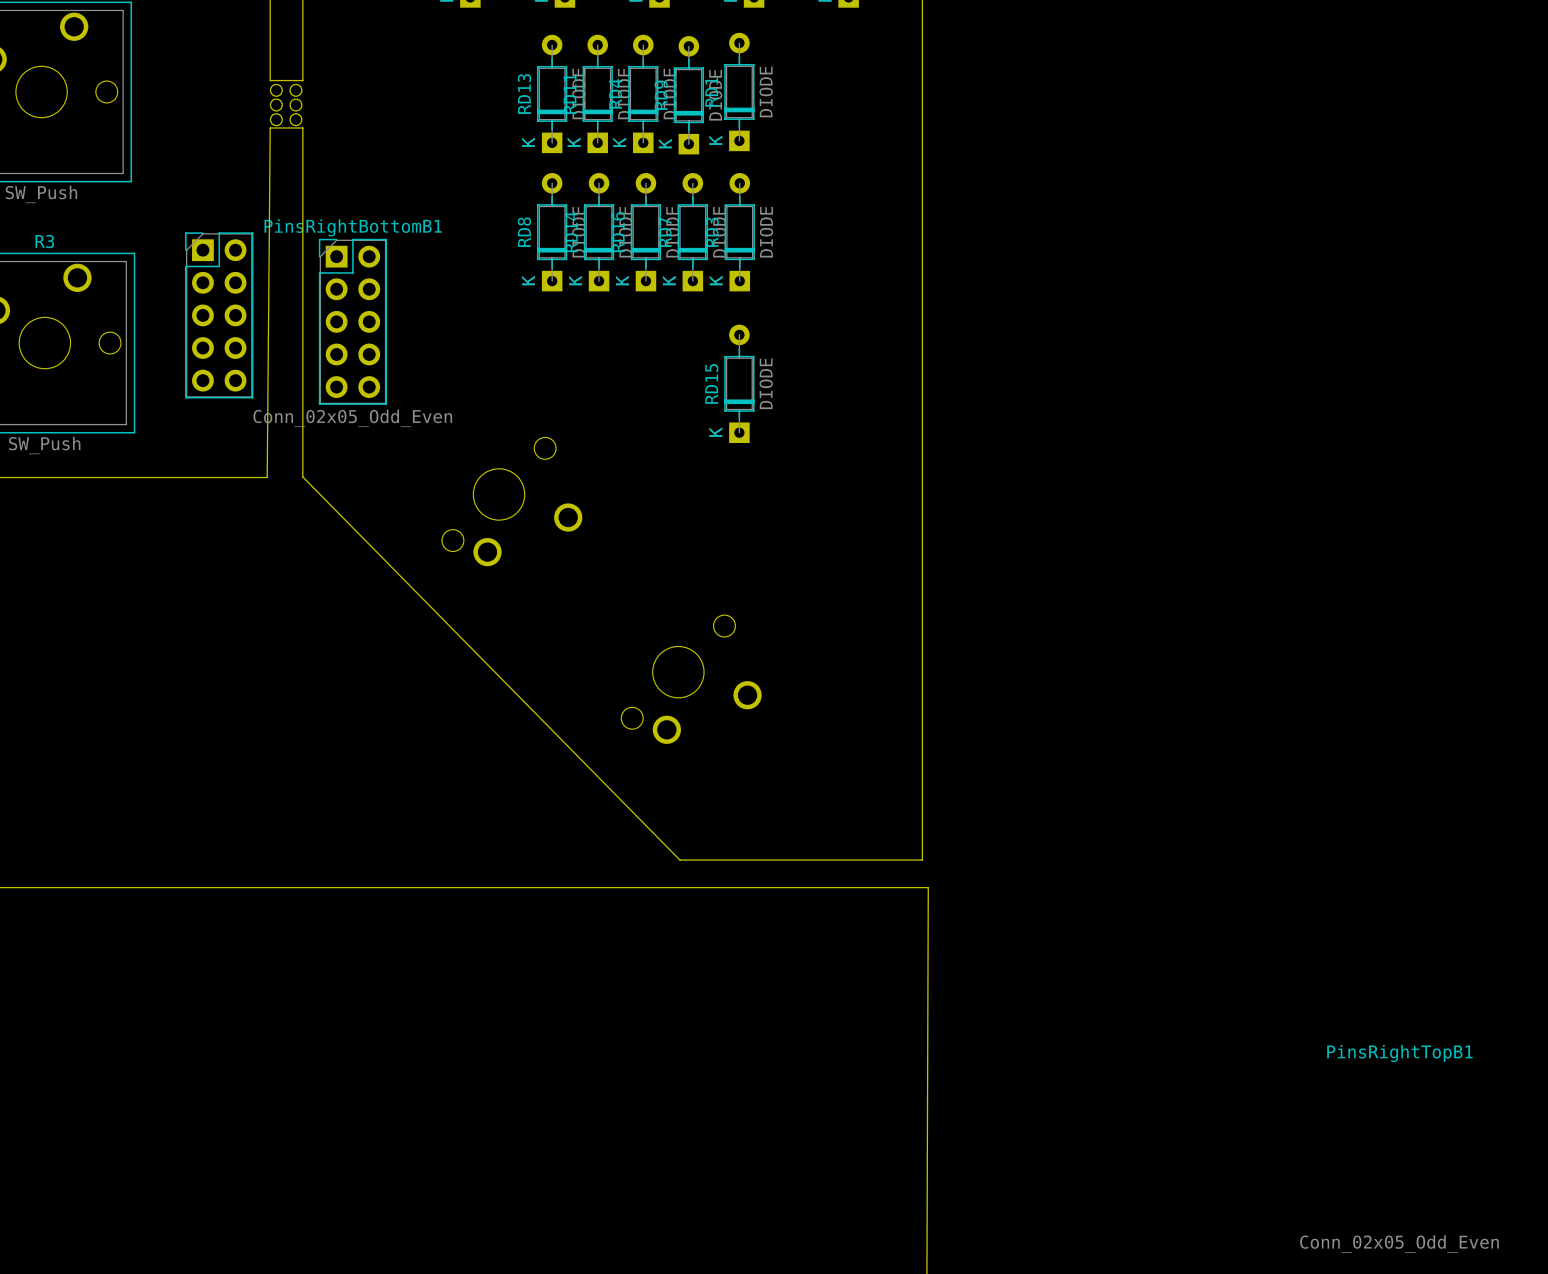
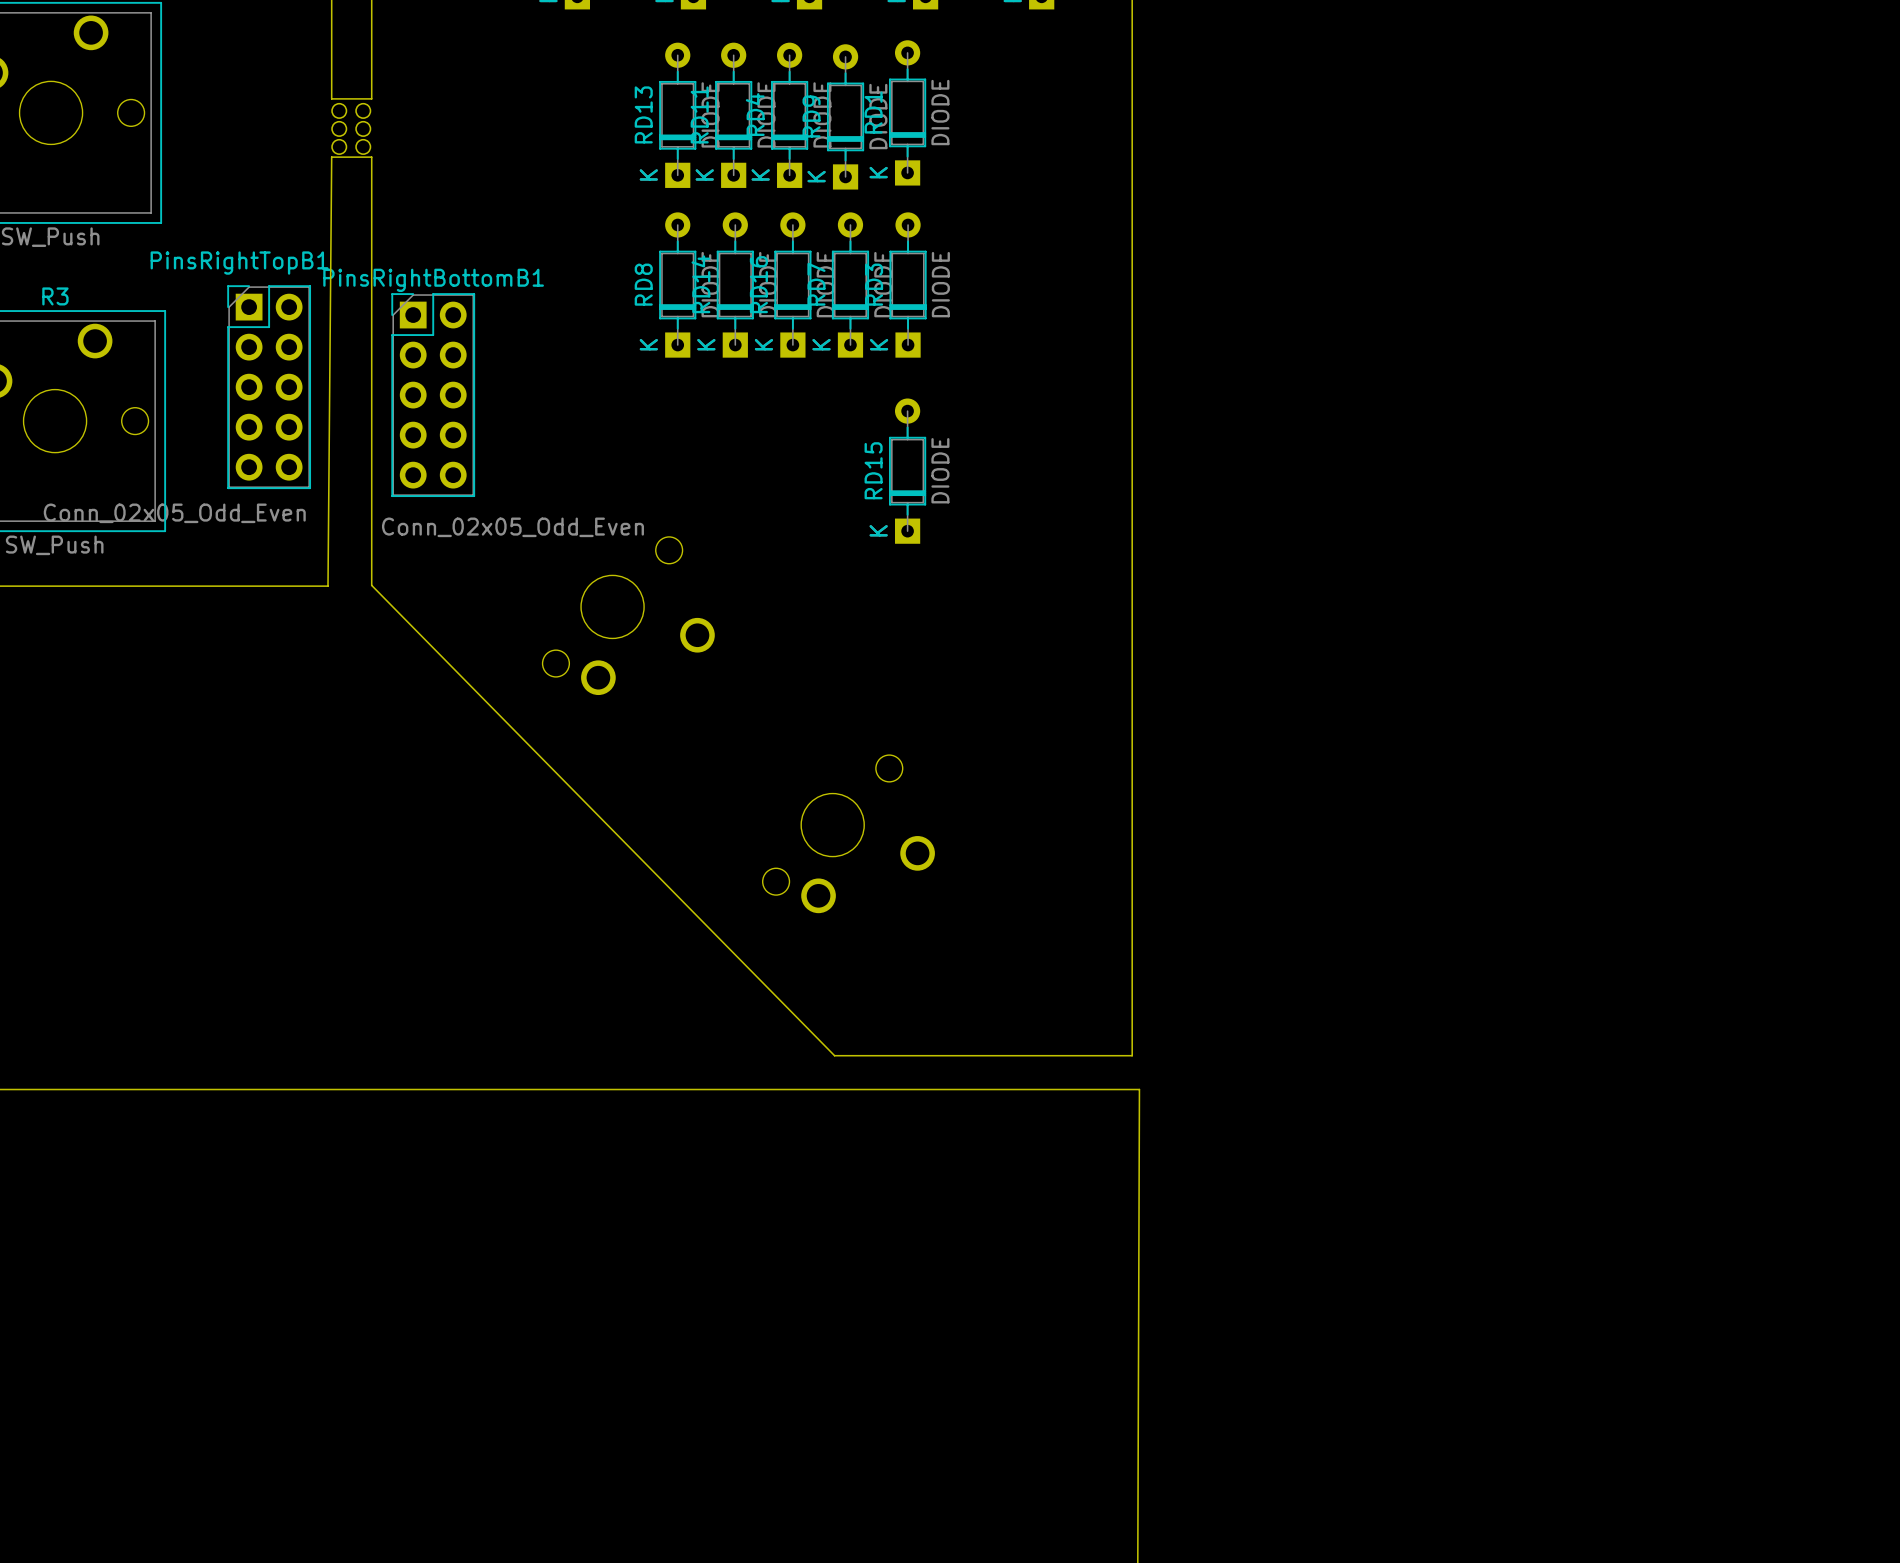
PinsRightBottomB1 value position: Conn_02x05_Odd_Even (352, 418) -> Conn_02x05_Odd_Even (512, 527)
PinsRightTopB1 name position: PinsRightTopB1 (1399, 1053) -> PinsRightTopB1 (239, 263)
PinsRightTopB1 value position: Conn_02x05_Odd_Even (1399, 1243) -> Conn_02x05_Odd_Even (174, 513)

